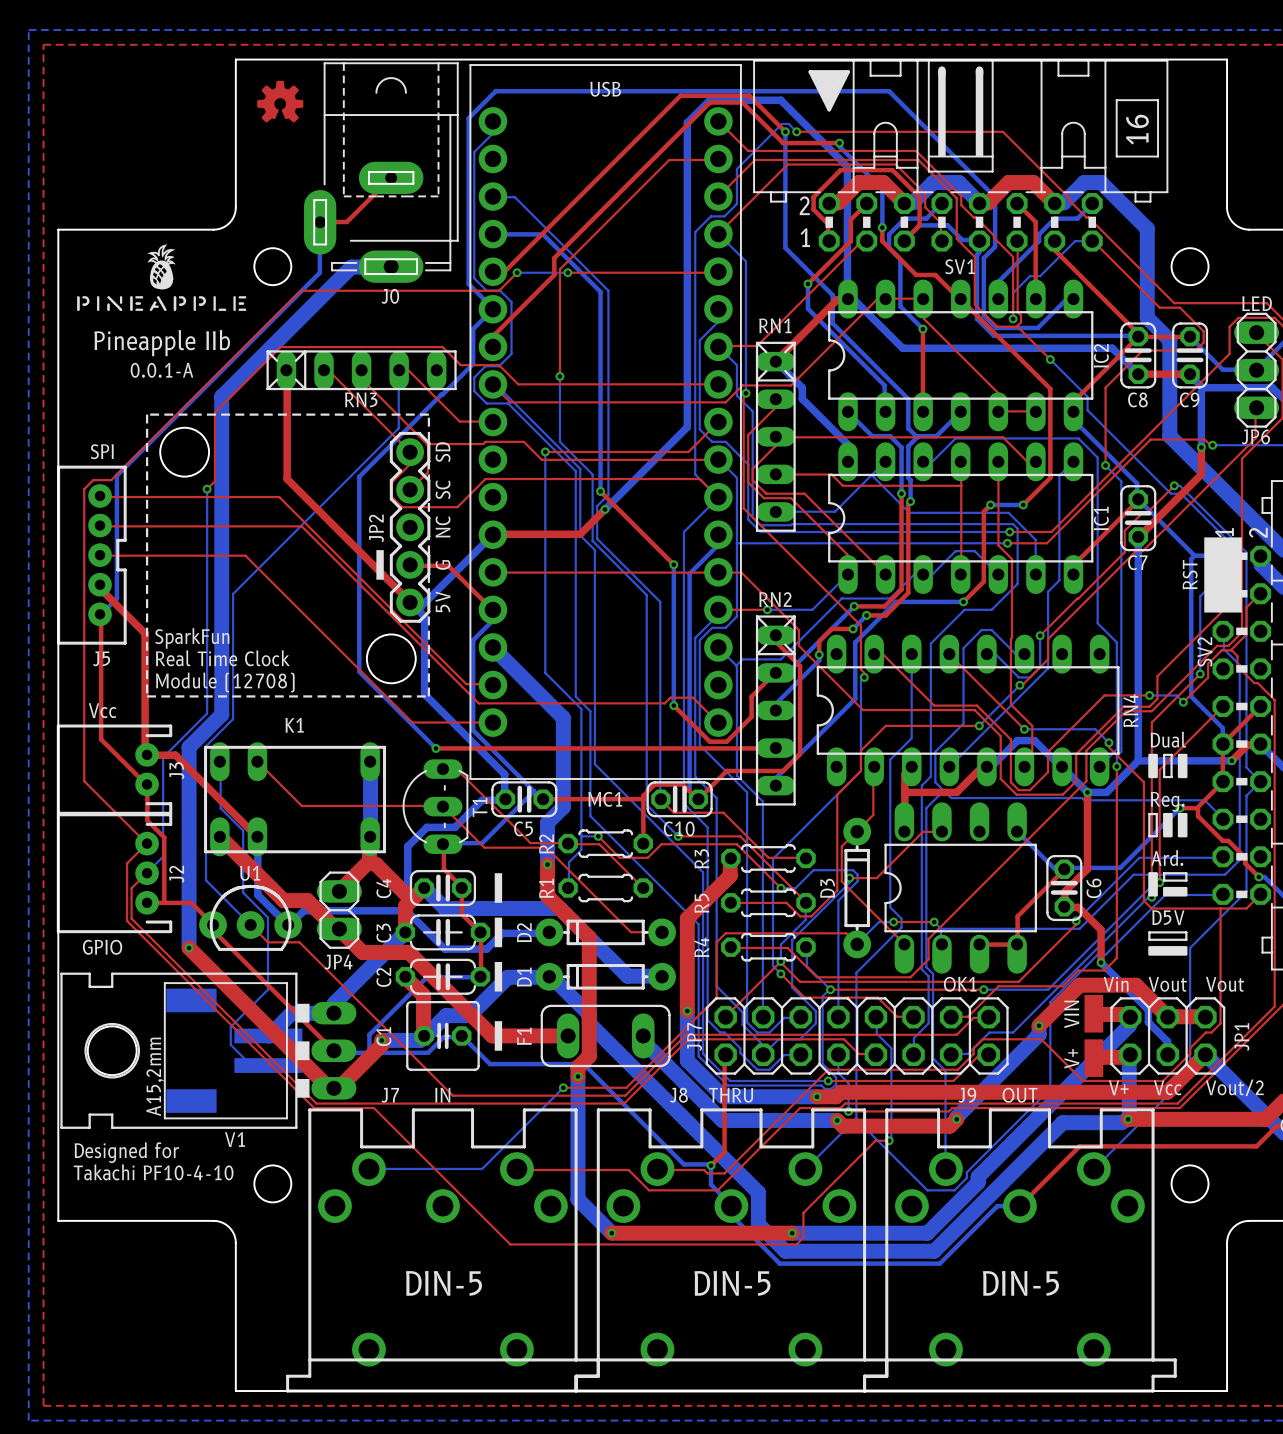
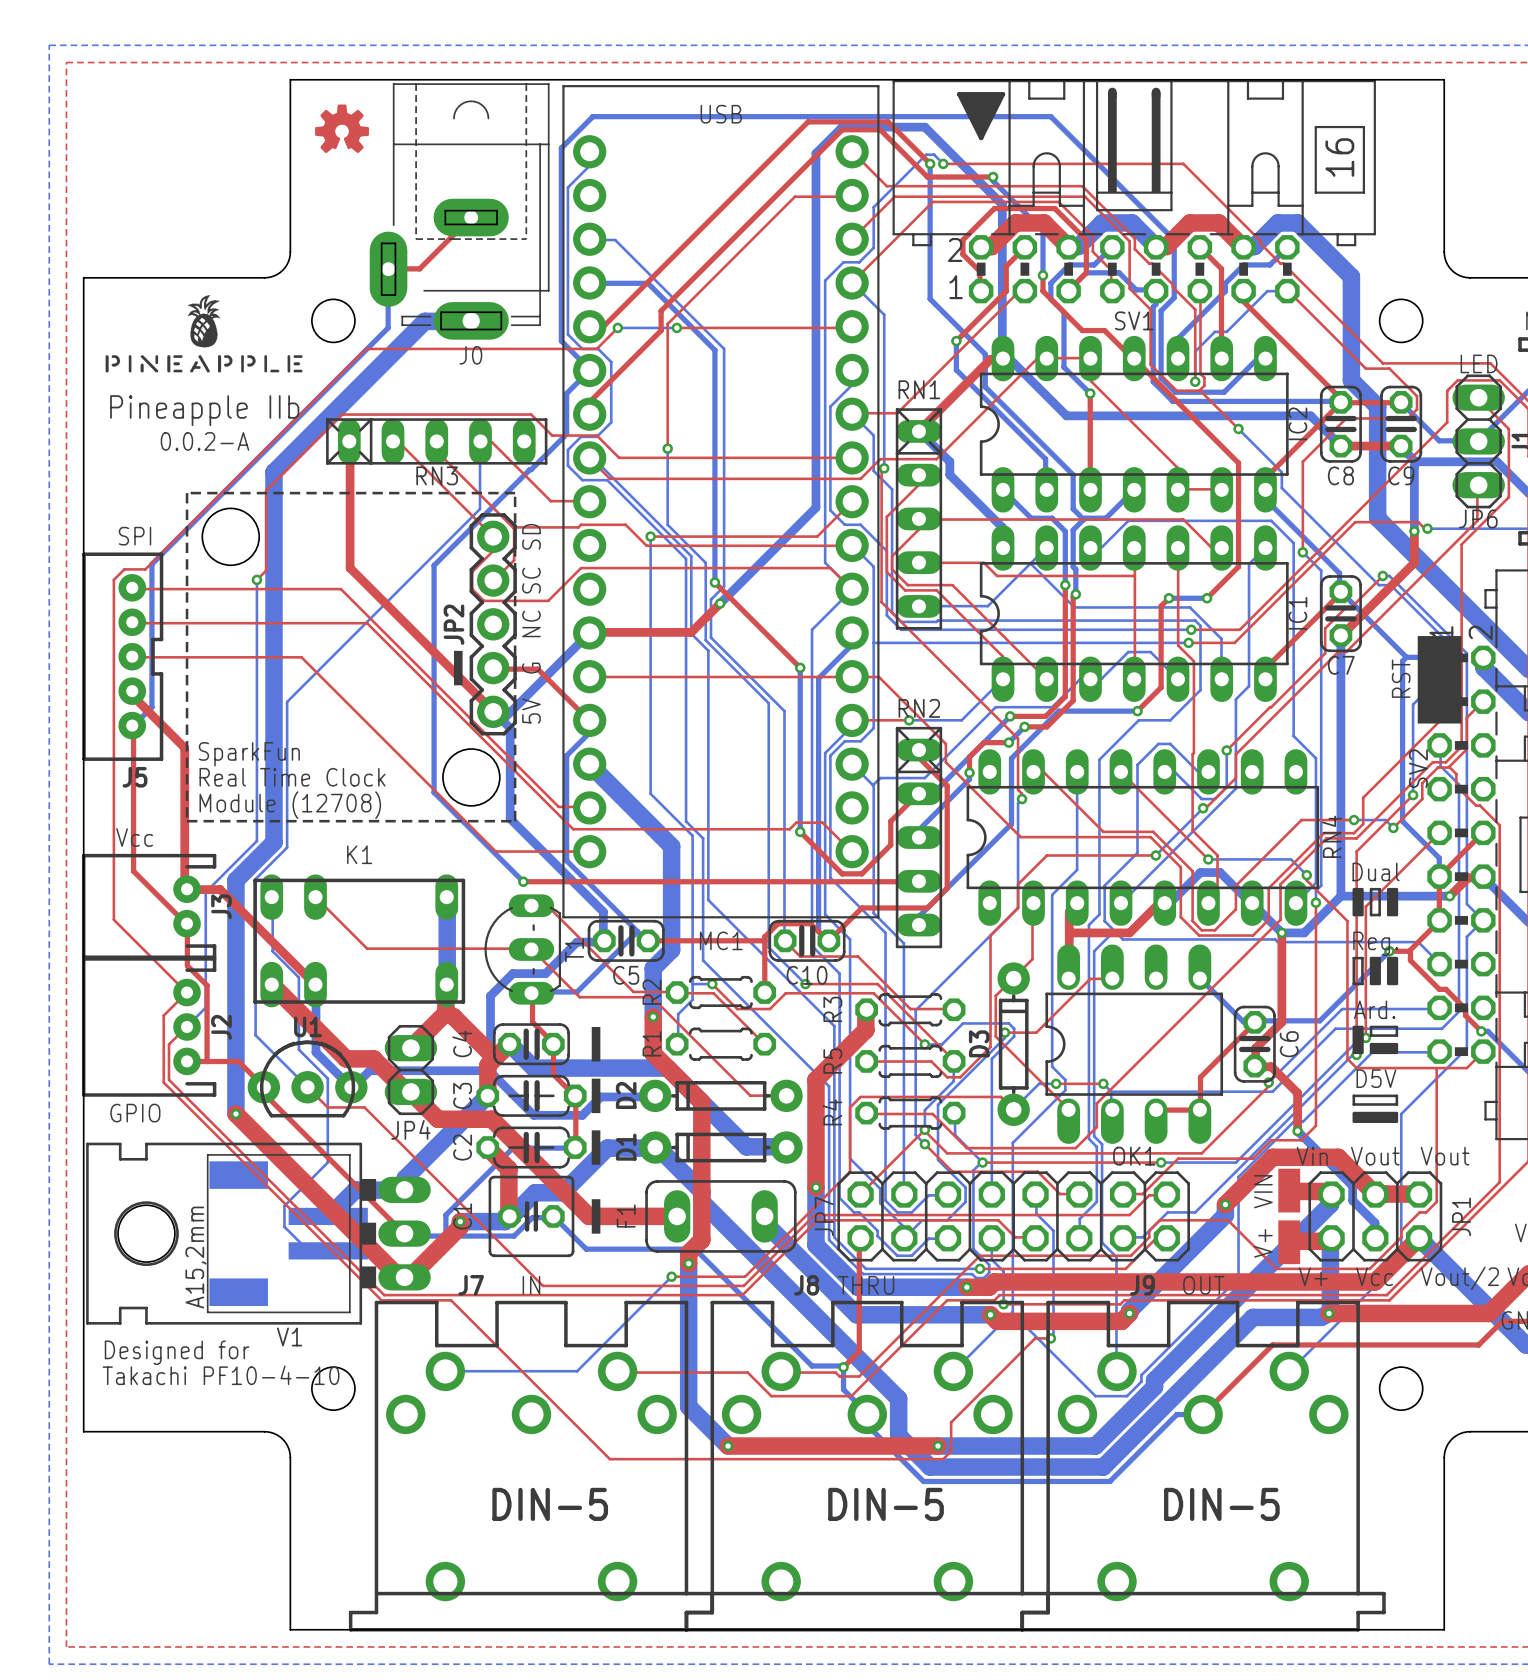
text: 0.0.1-A (161, 370) -> 0.0.2-A (204, 441)

